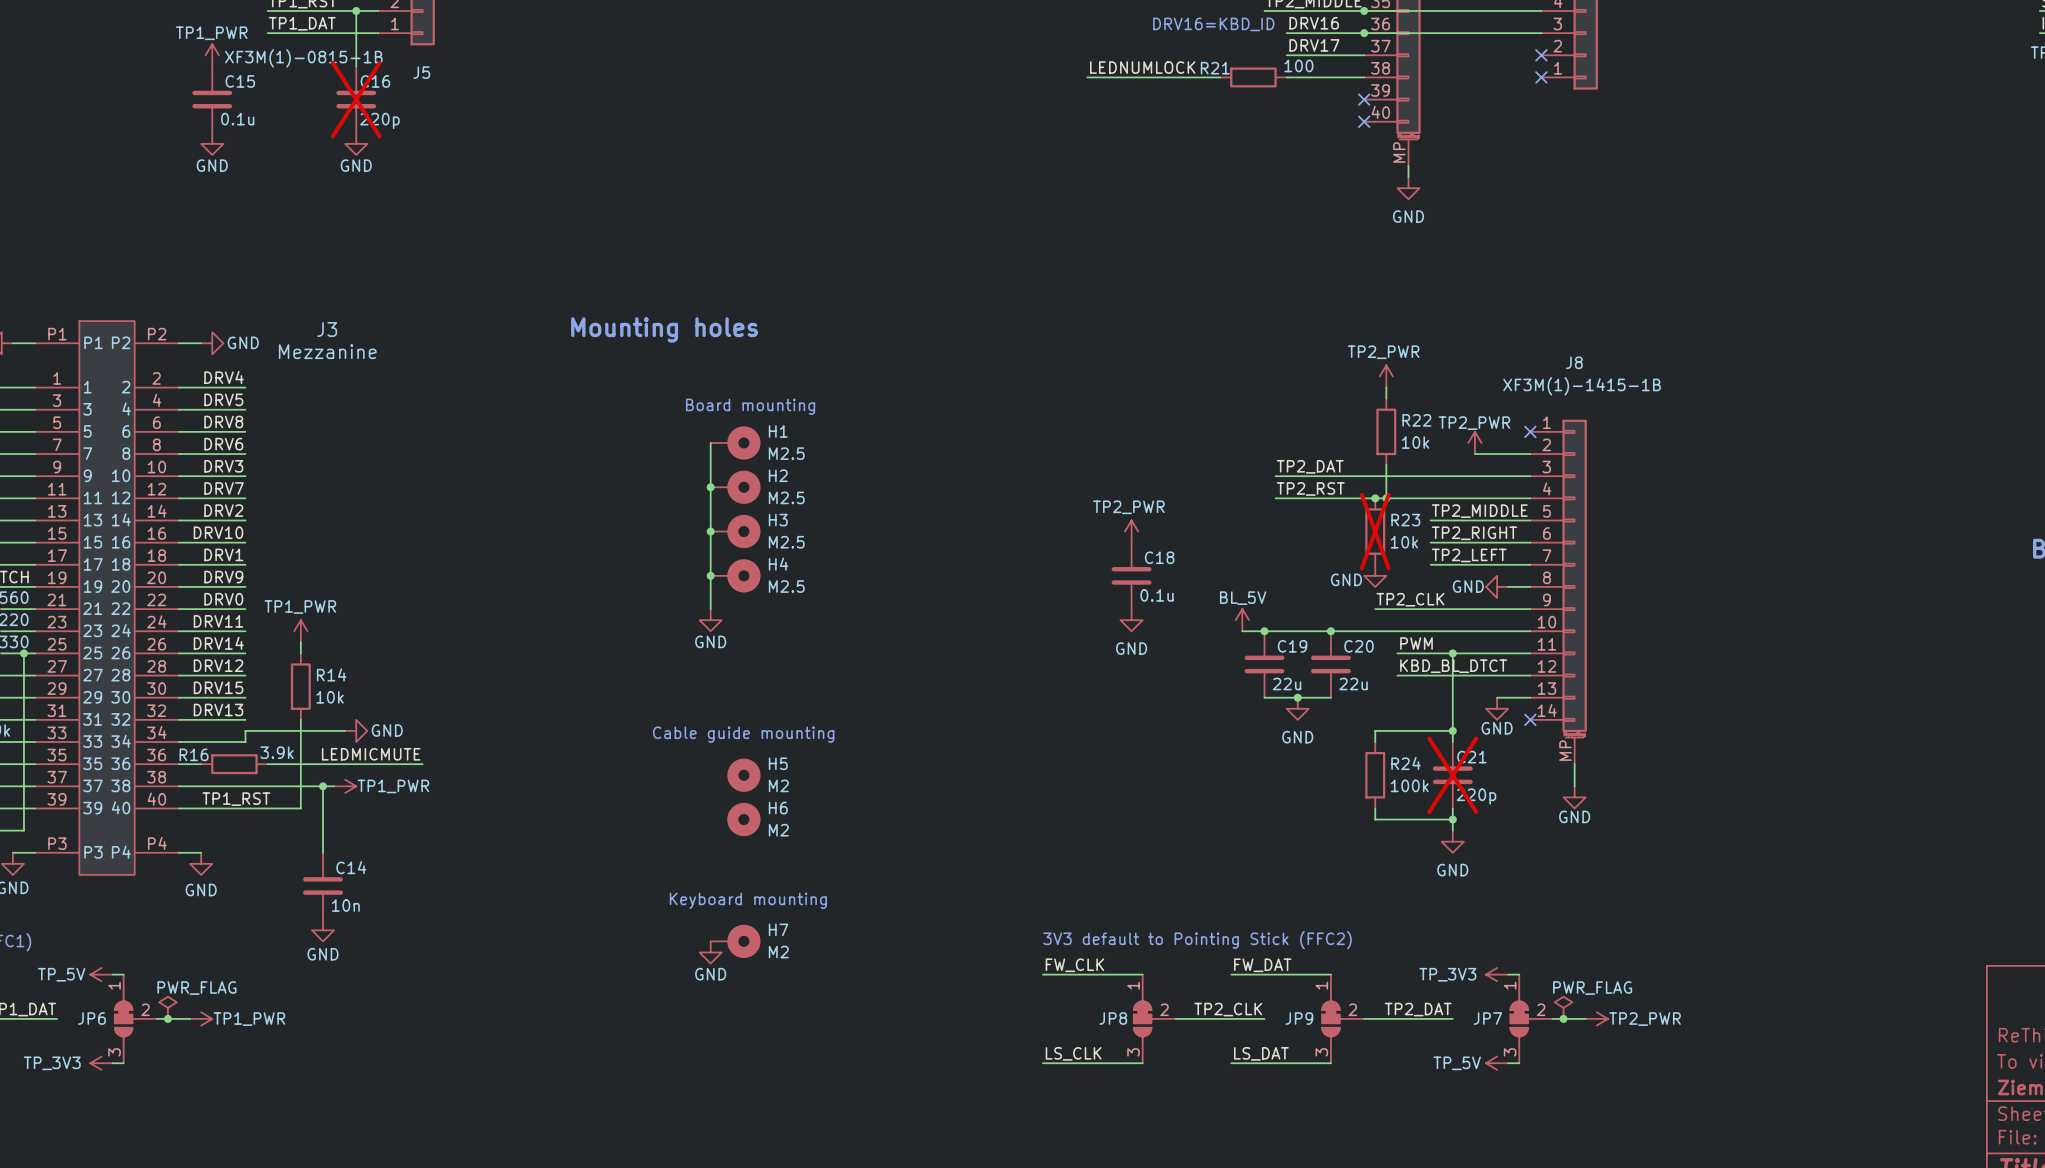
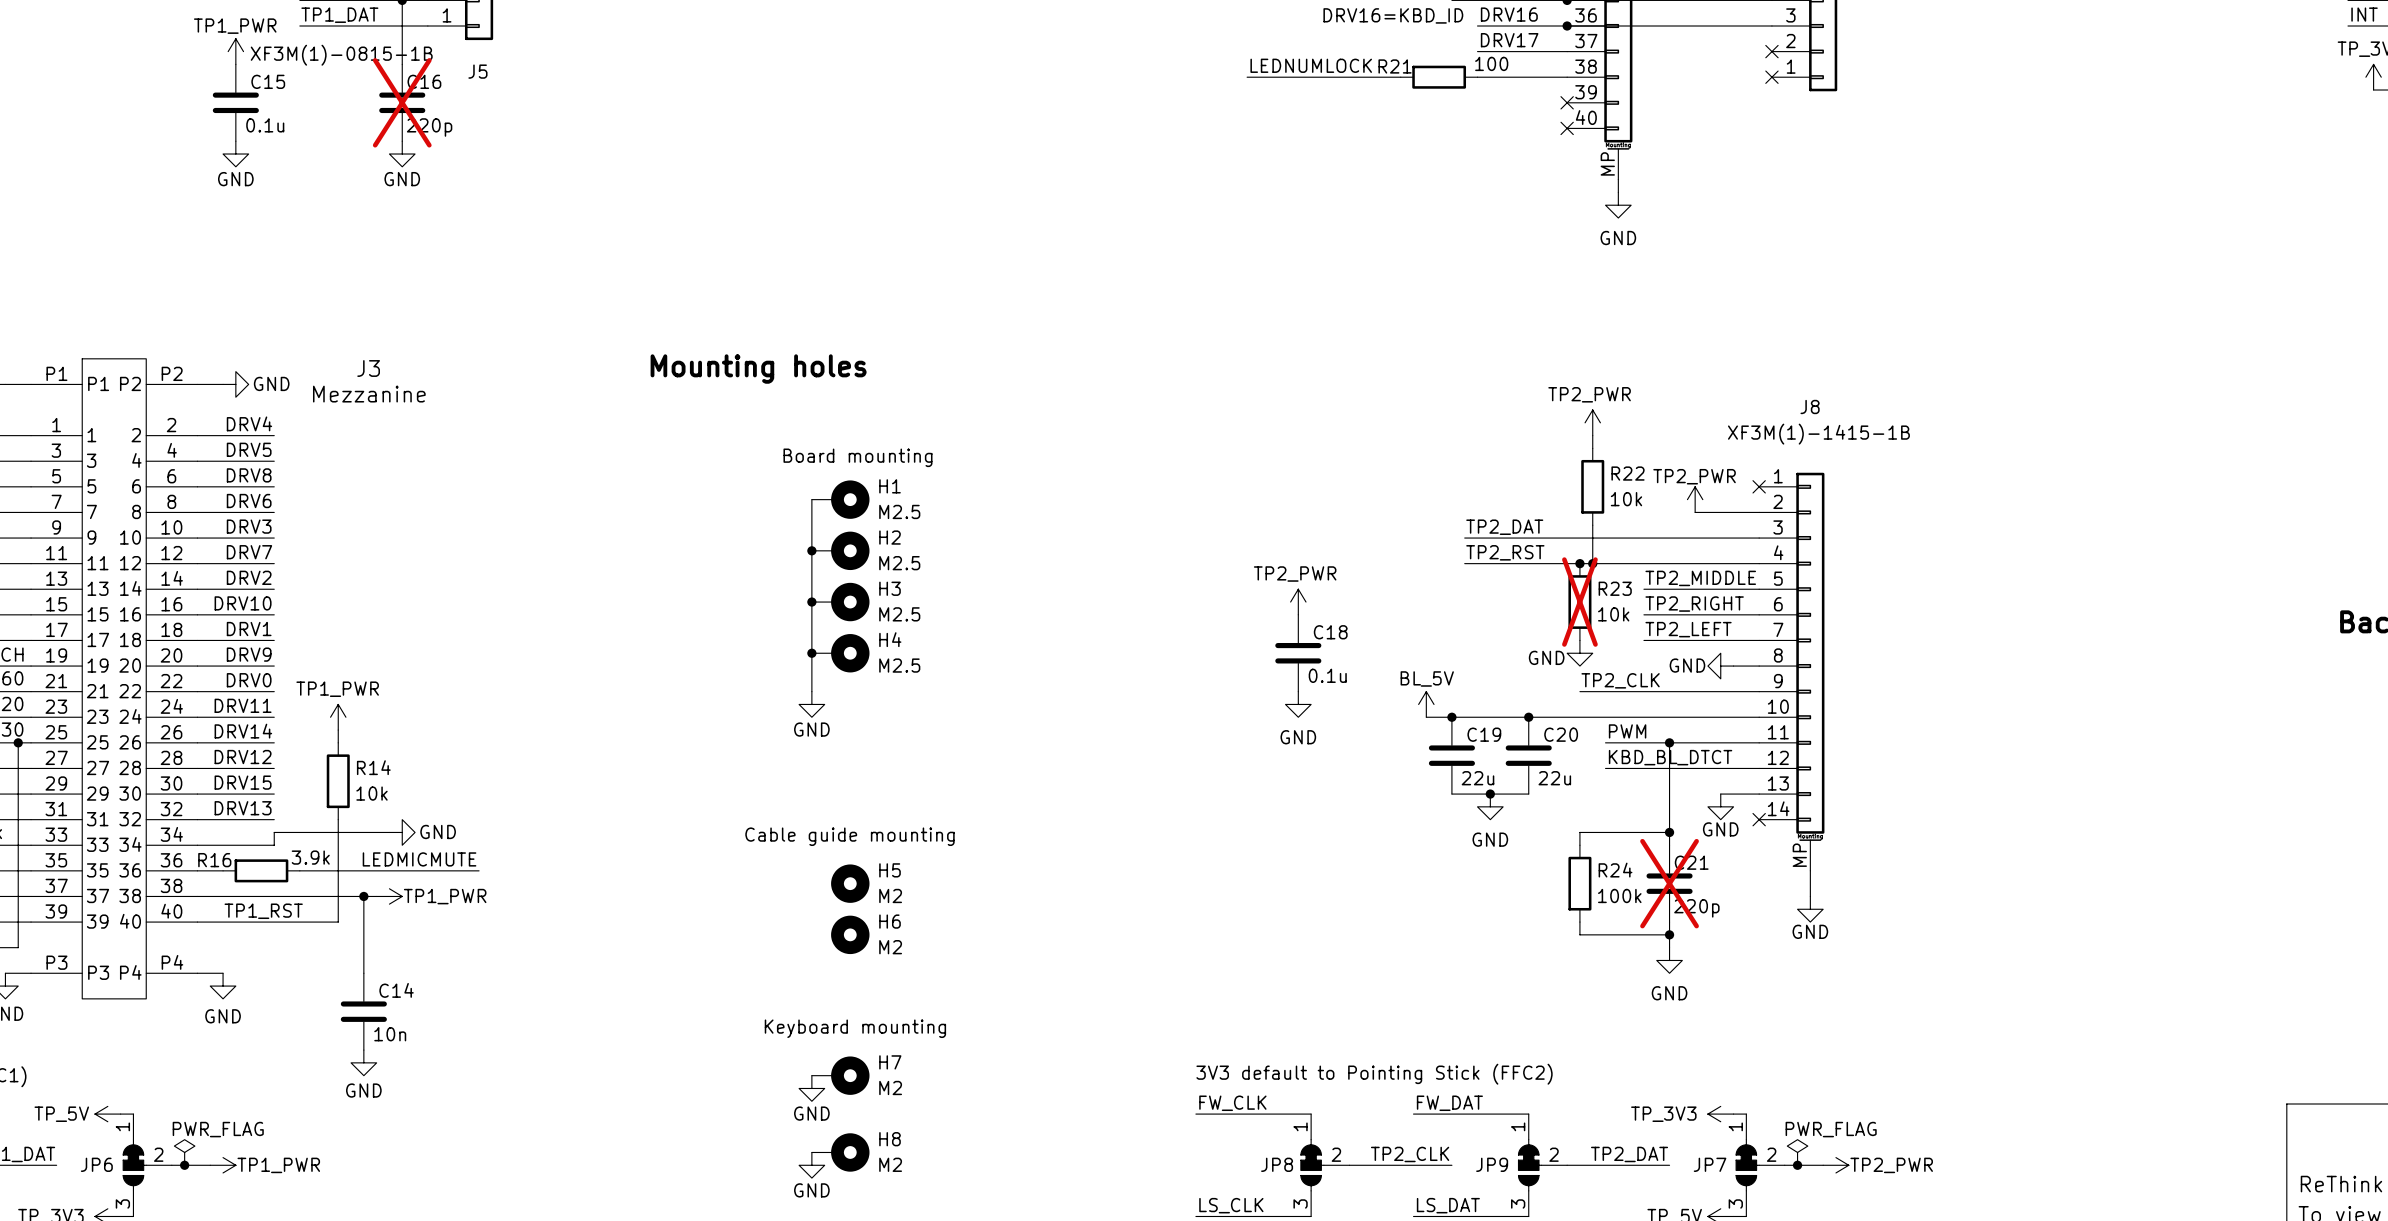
H8: none -> M2 (840, 1152)
power symbol: none -> GND (811, 1165)

